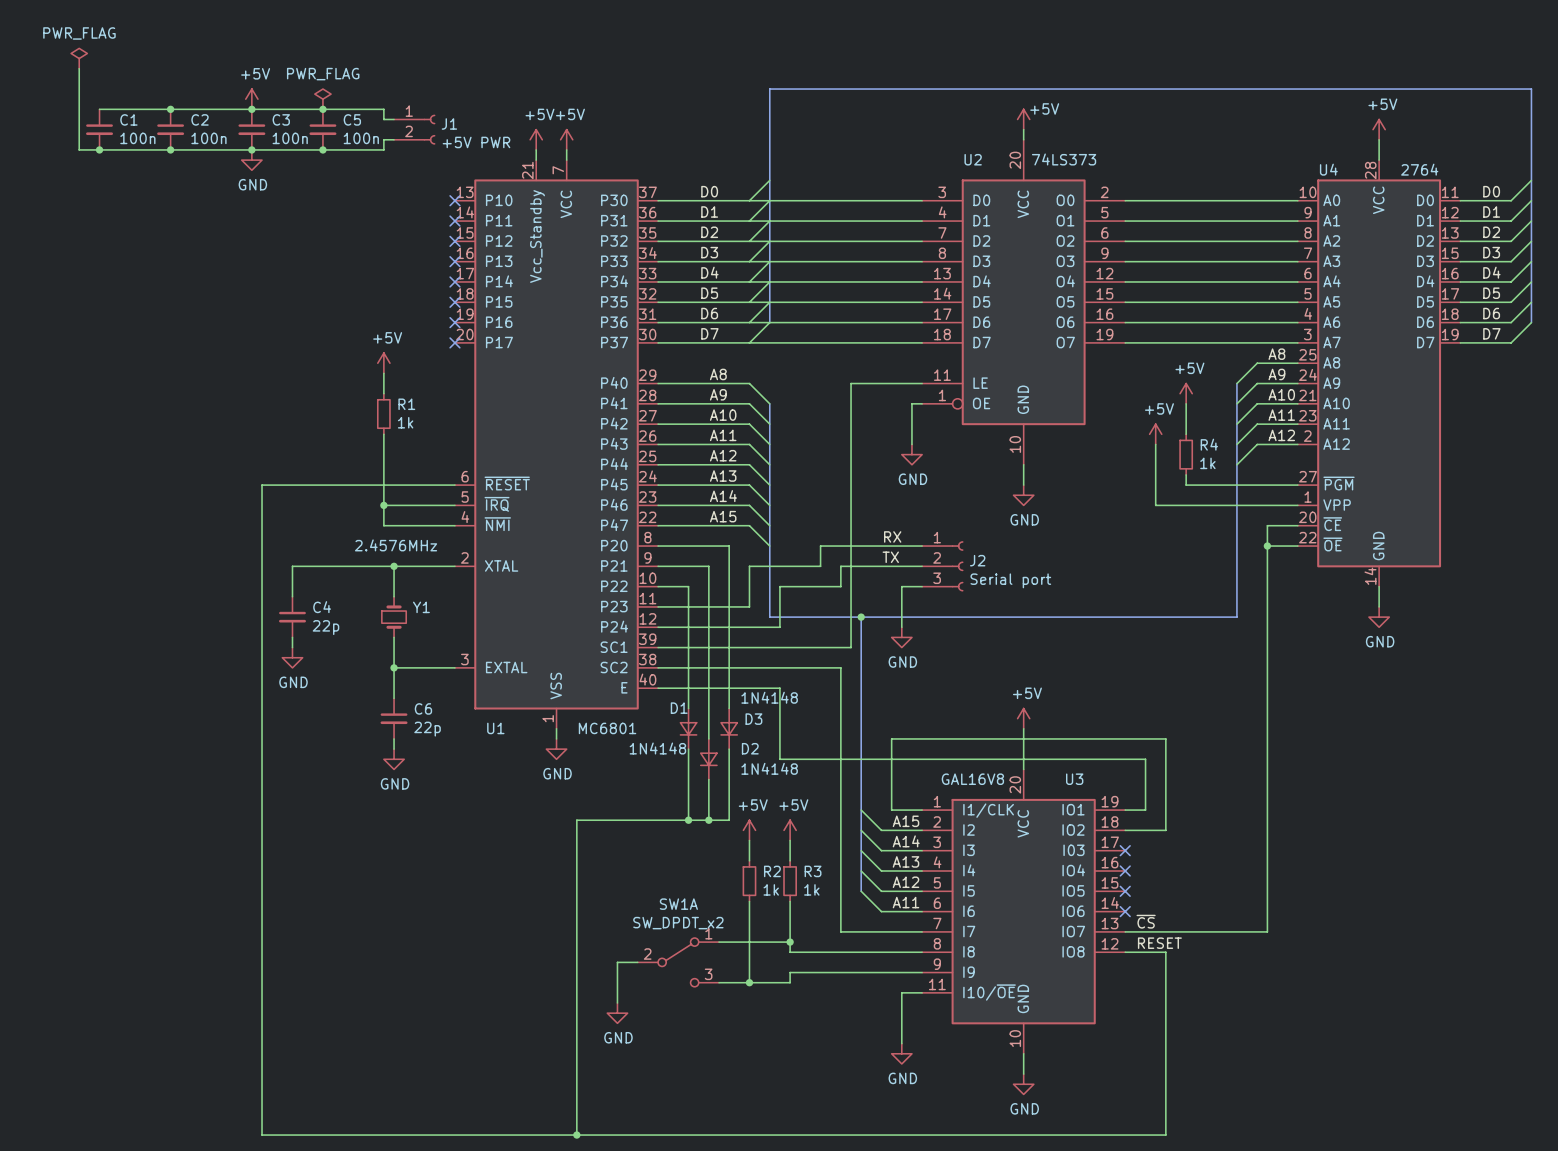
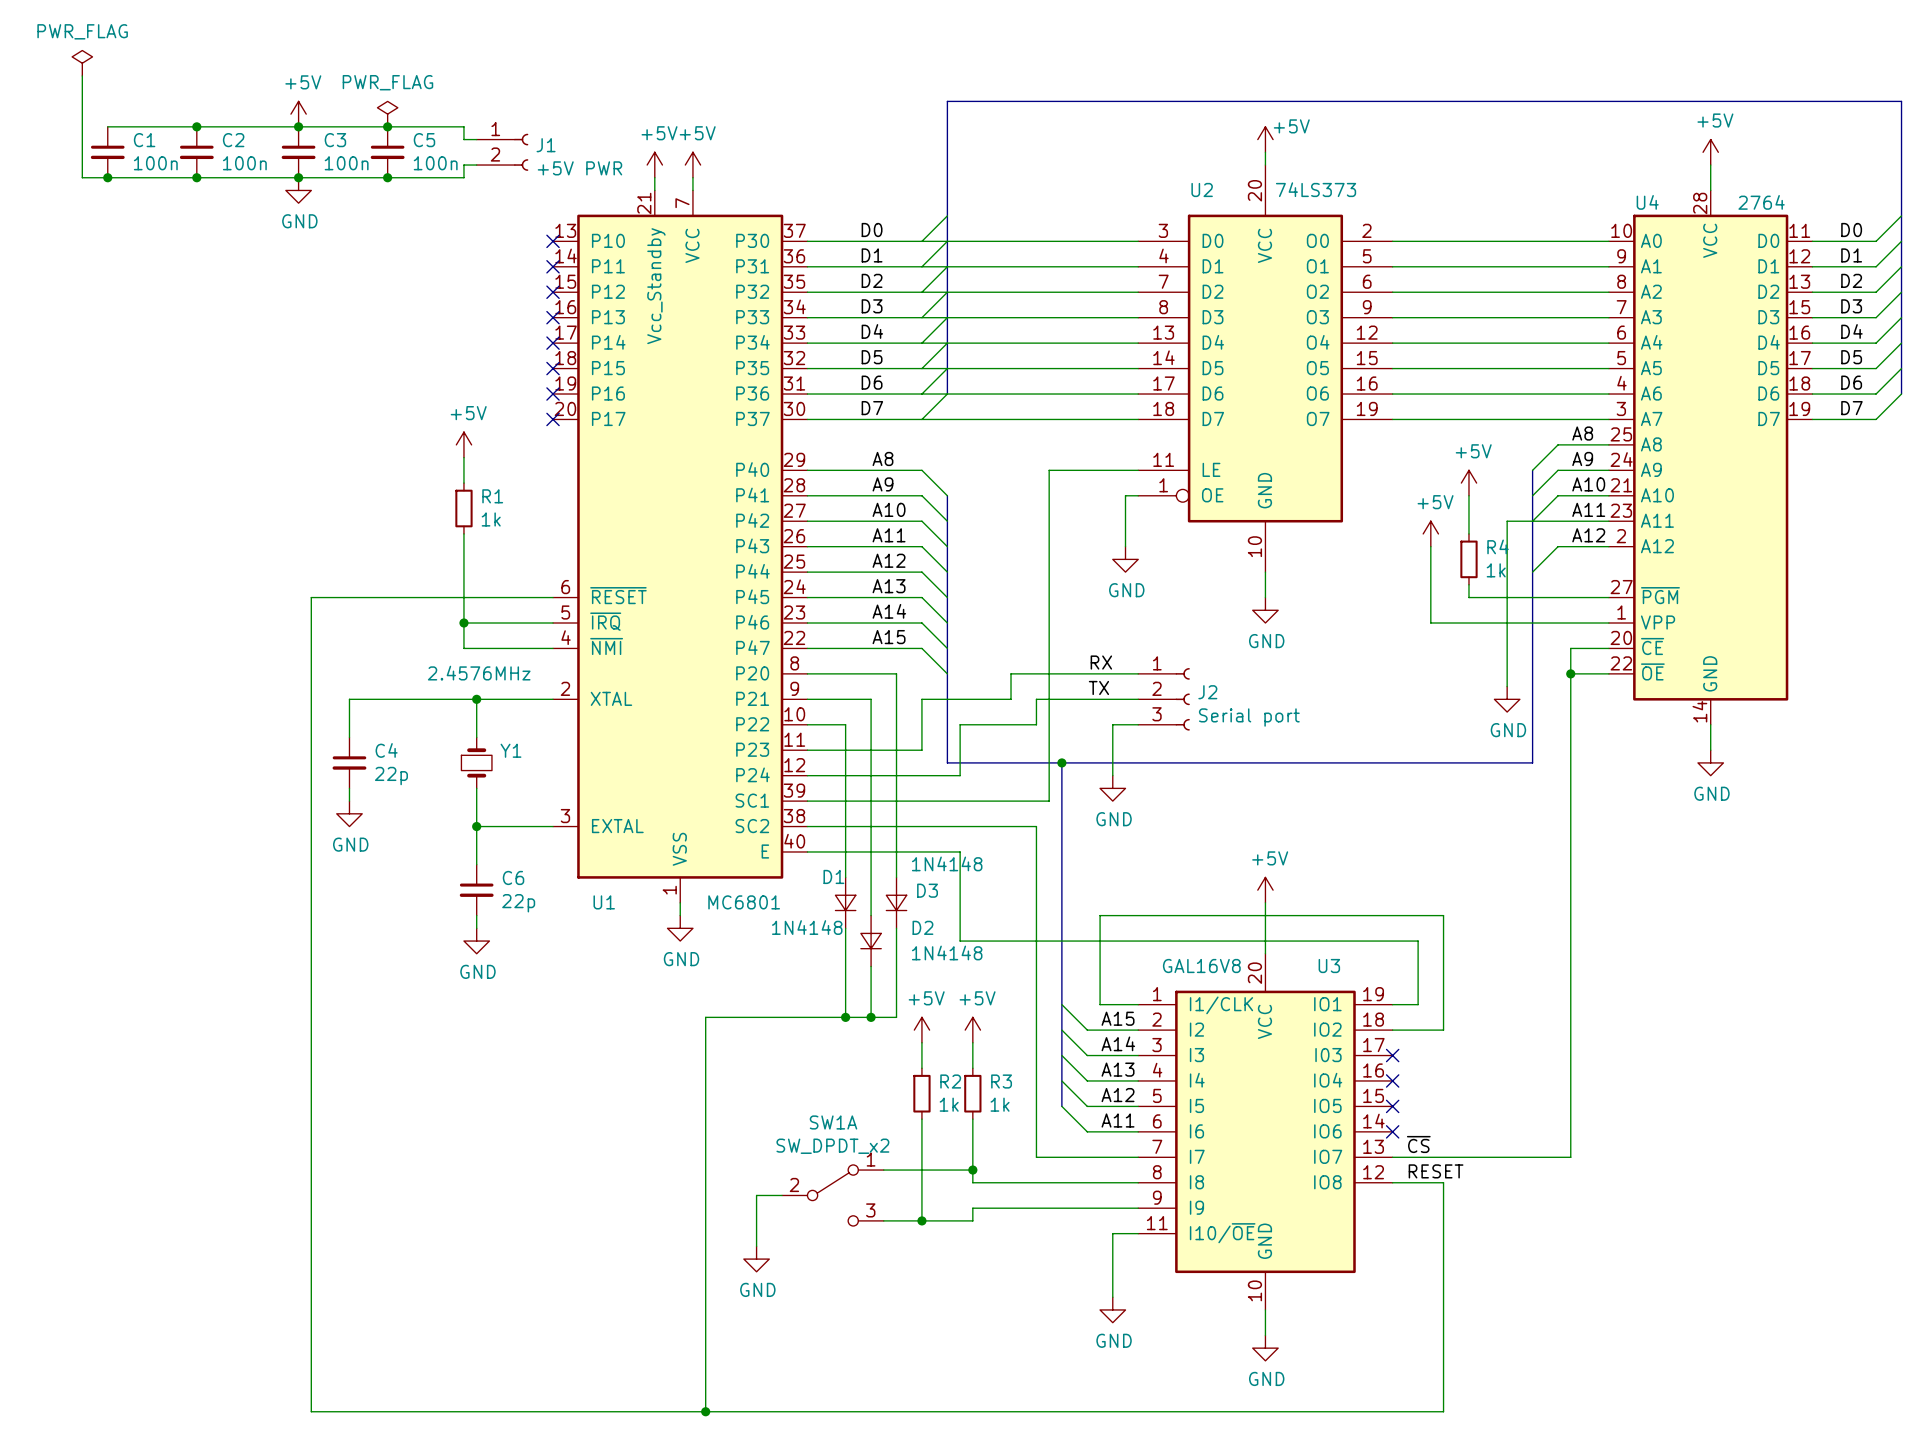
wire: (1257, 424) (1236, 444) -> (1558, 521) (1507, 521) (1507, 686)
power symbol: none -> GND (1507, 699)

